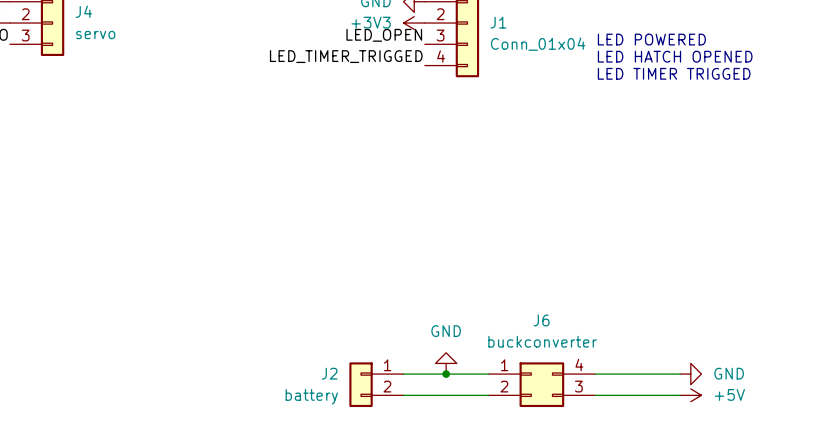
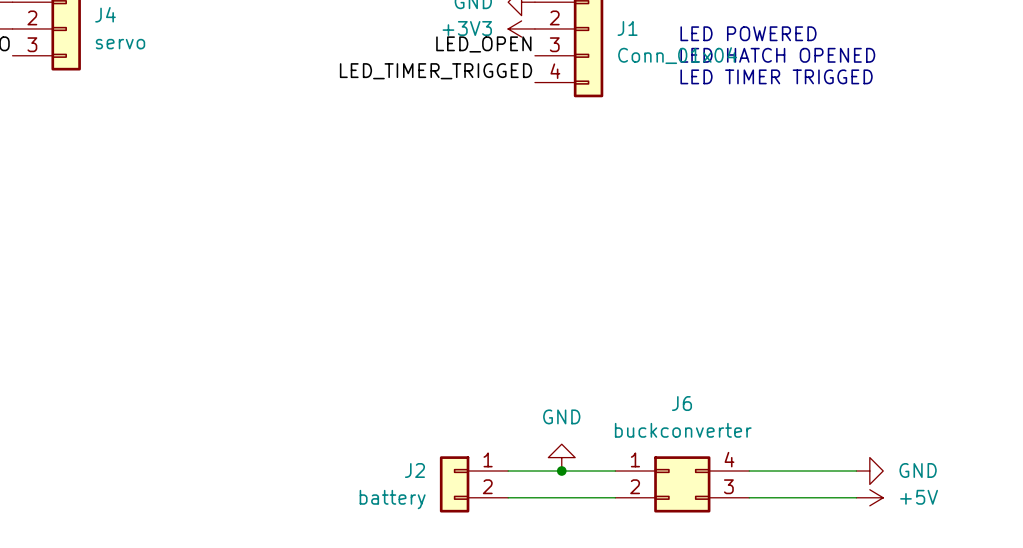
text position: LED POWERED (651, 39) -> LED POWERED (748, 33)
text position: LED HATCH OPENED (675, 56) -> LED HATCH OPENED (777, 55)
text position: LED TIMER TRIGGED (674, 73) -> LED TIMER TRIGGED (776, 76)

